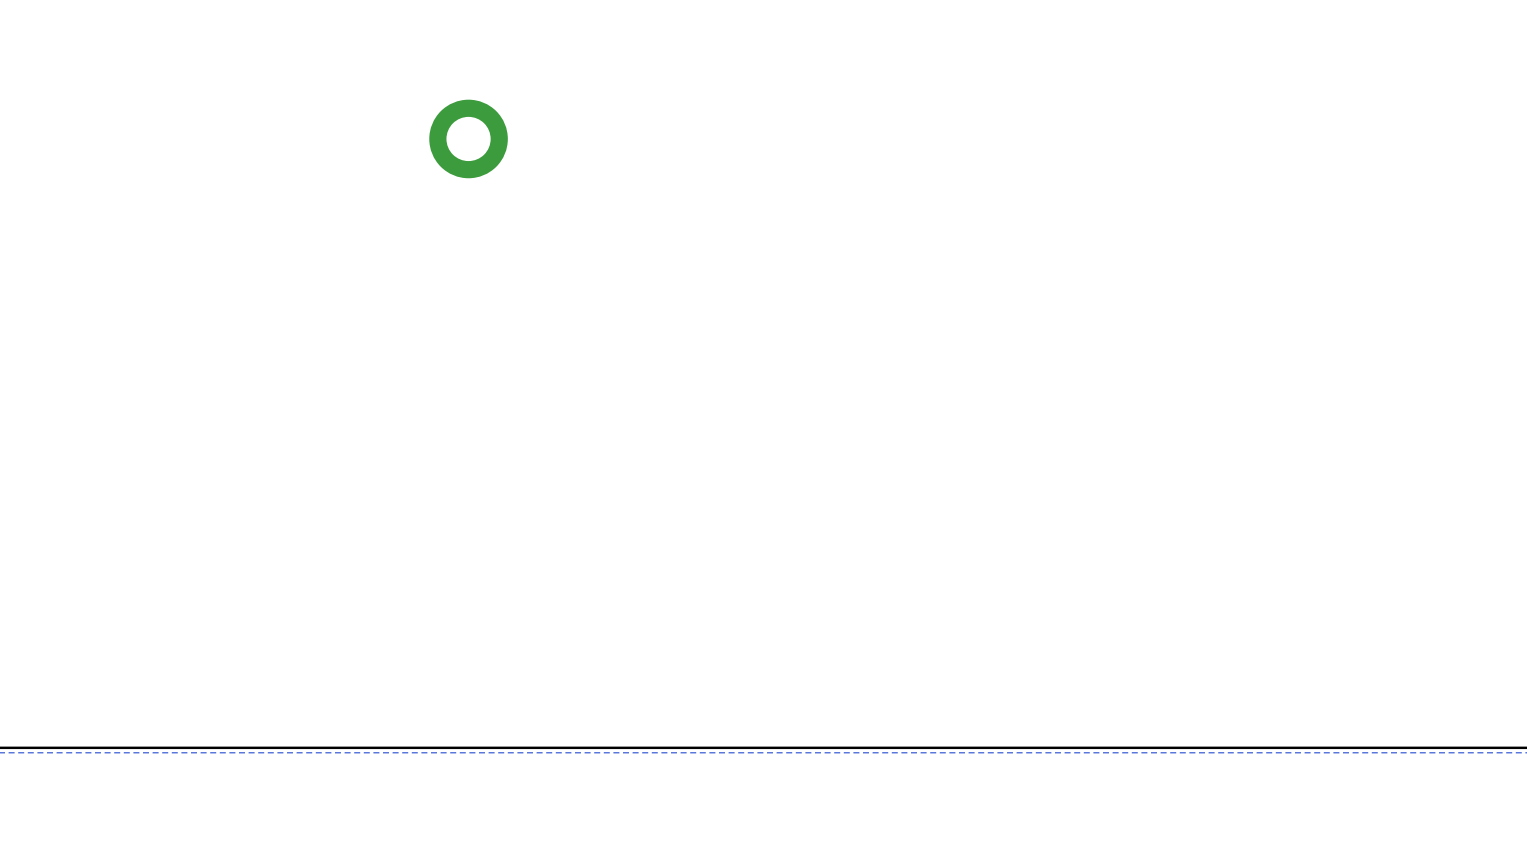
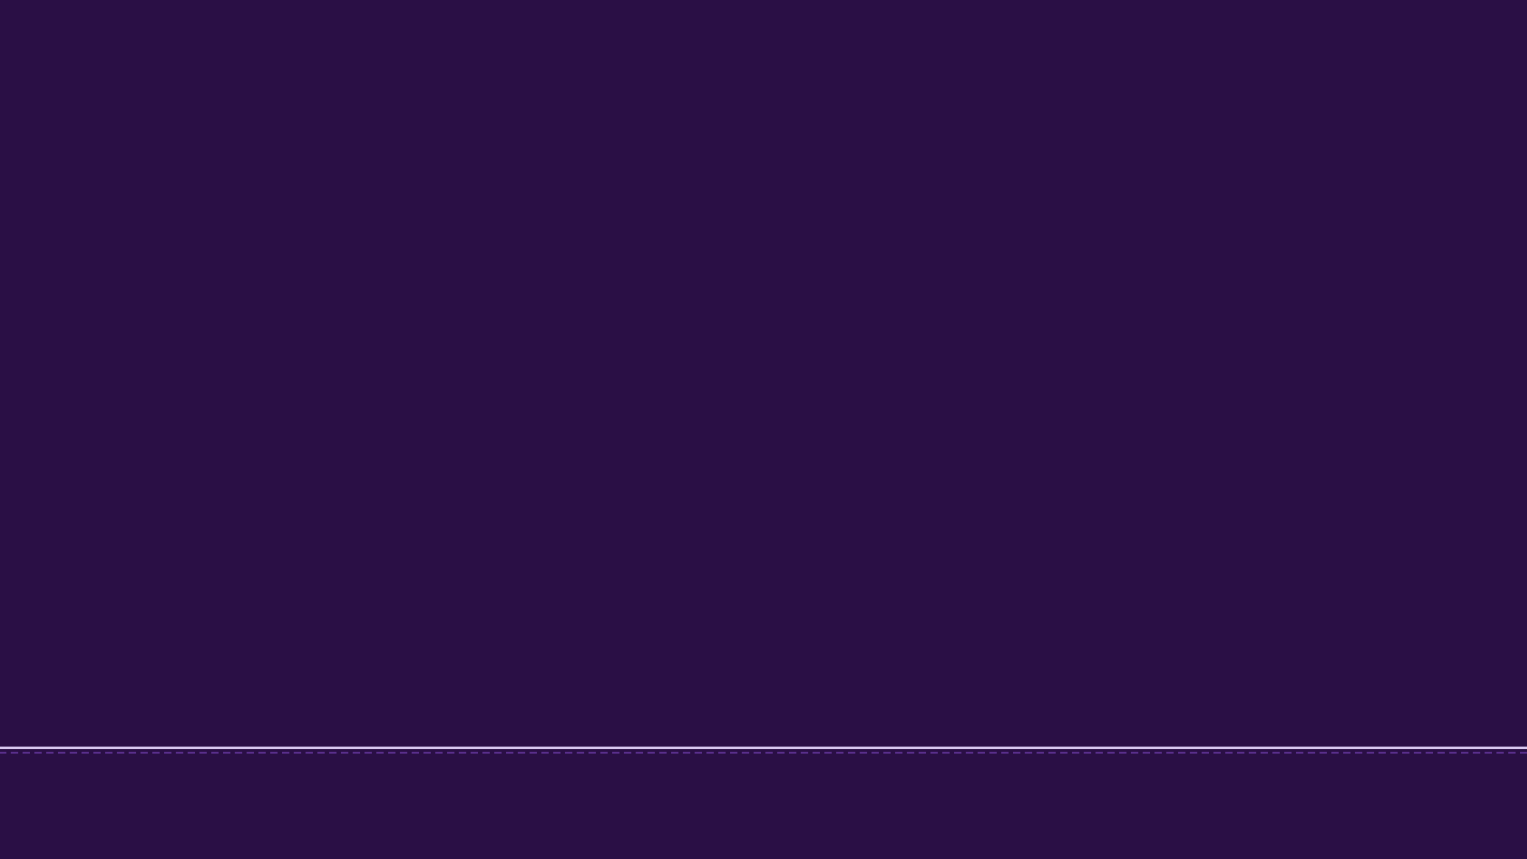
via: (468, 138) -> none

